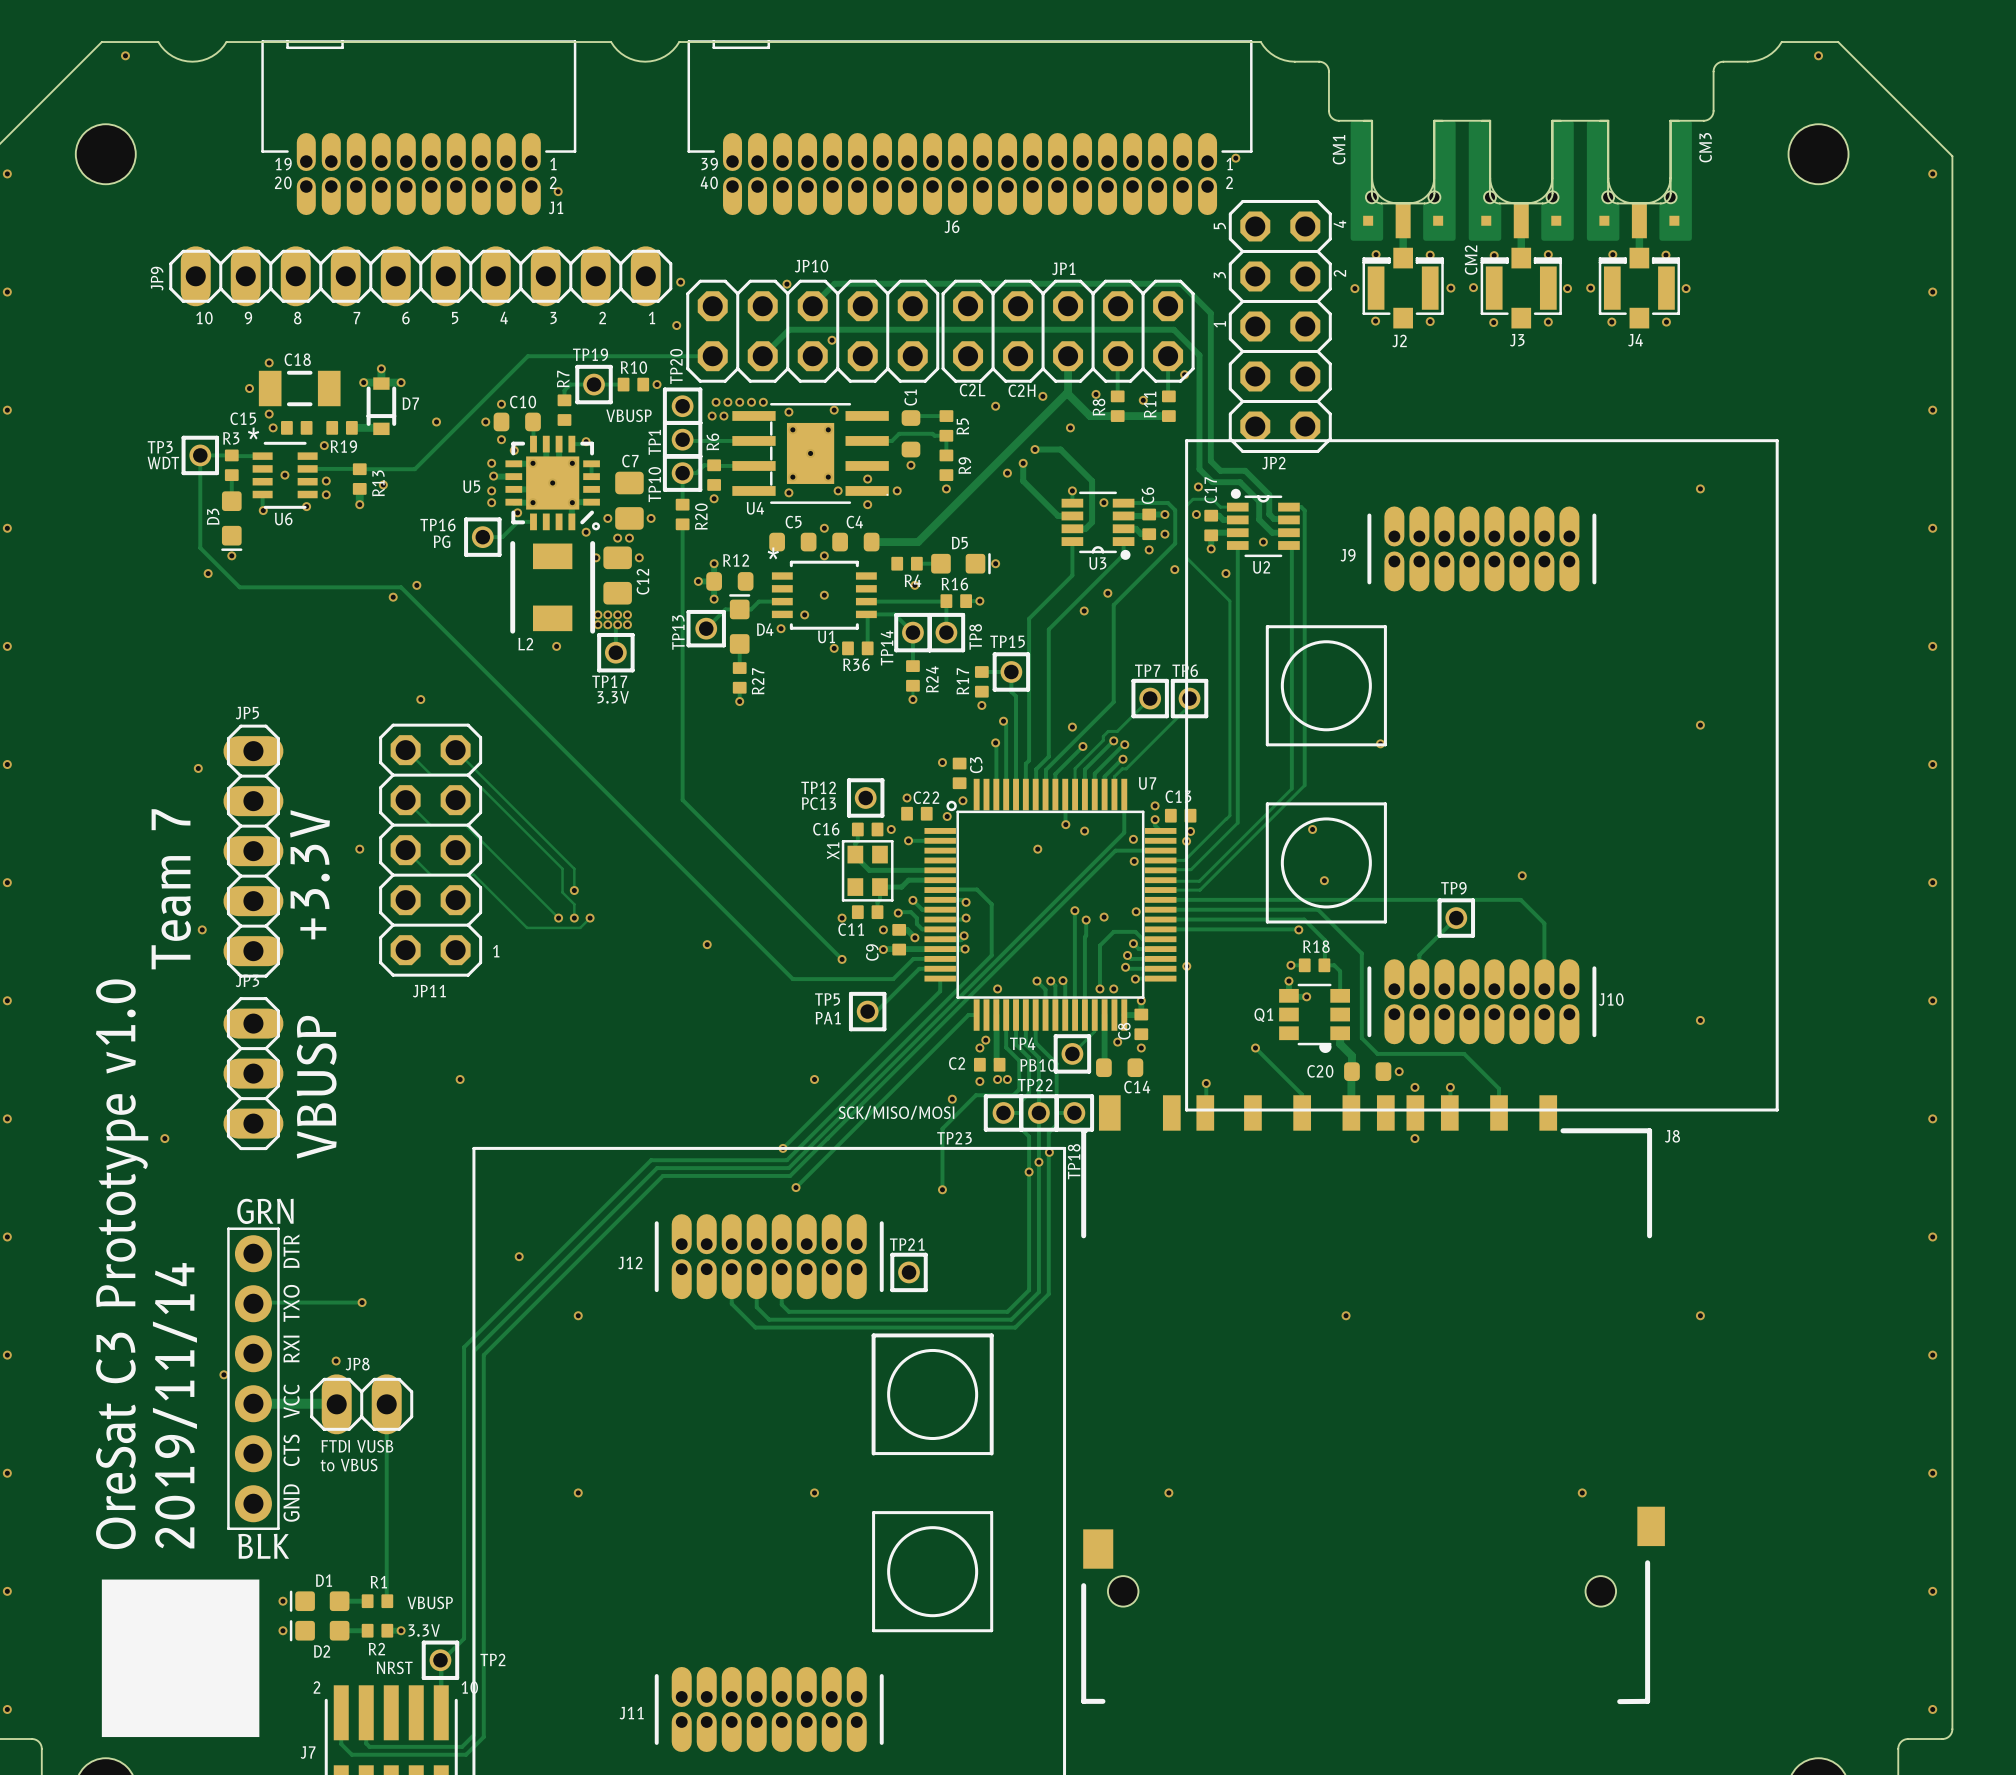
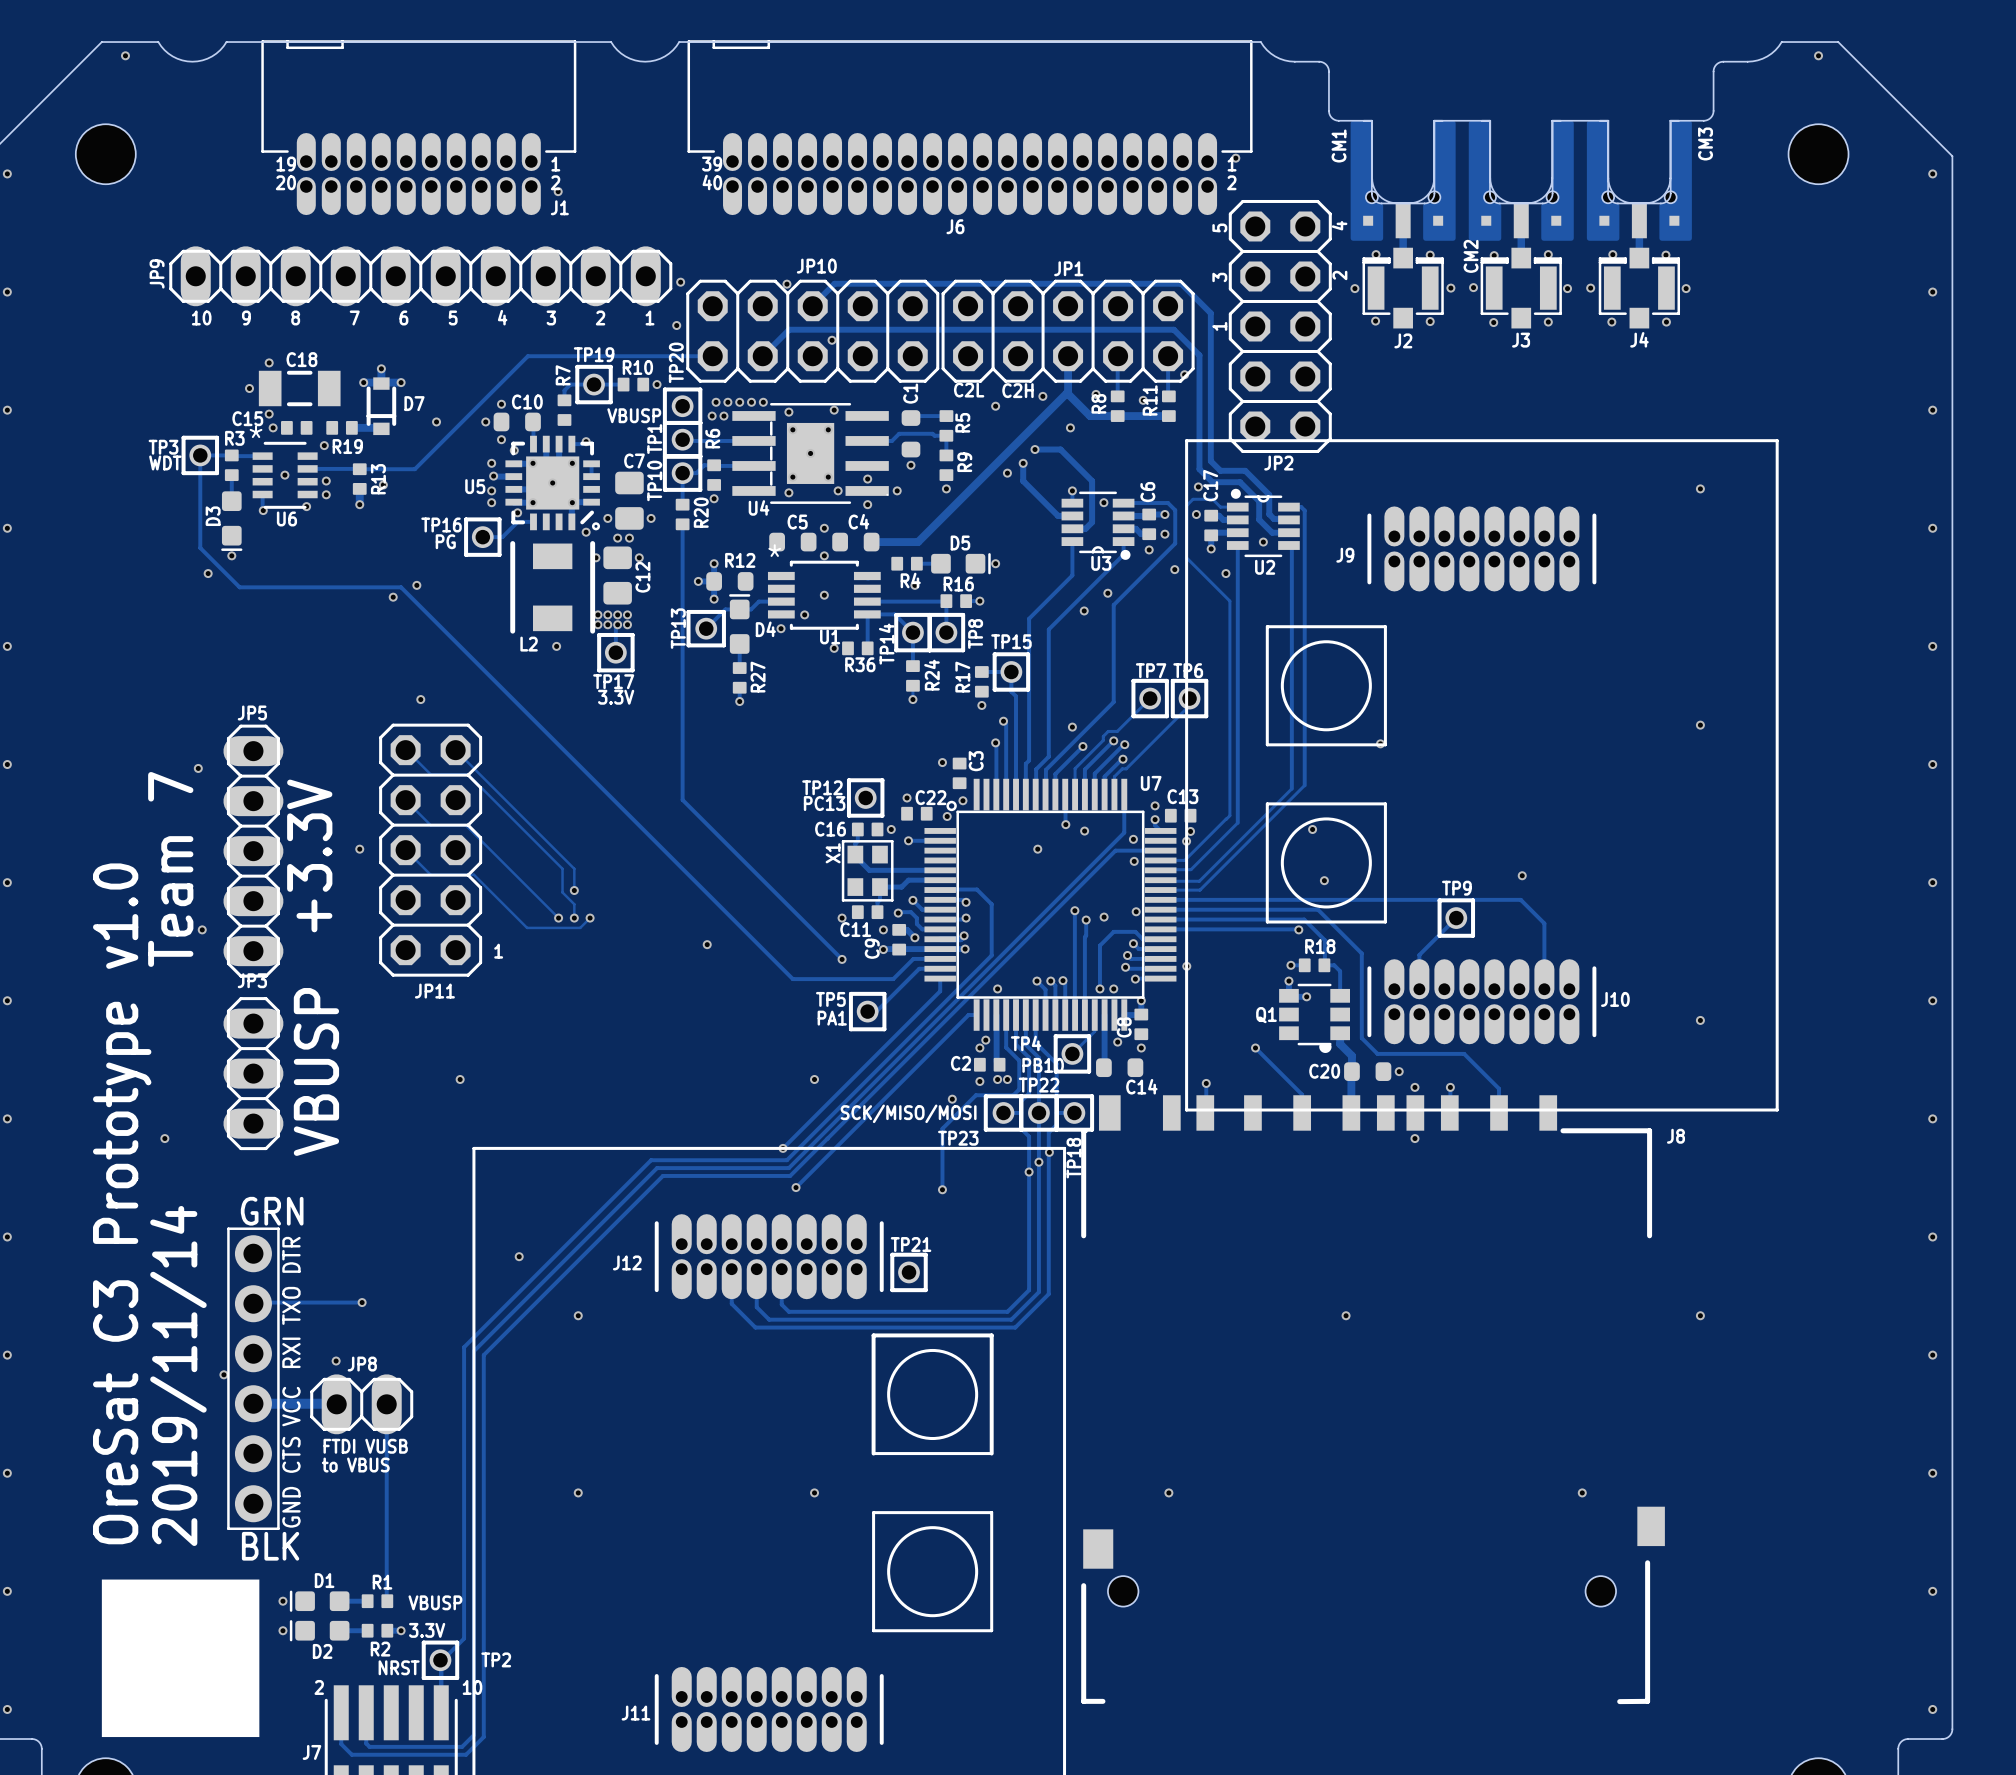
U1 footprint: [771, 560, 877, 630] -> [767, 560, 881, 630]

